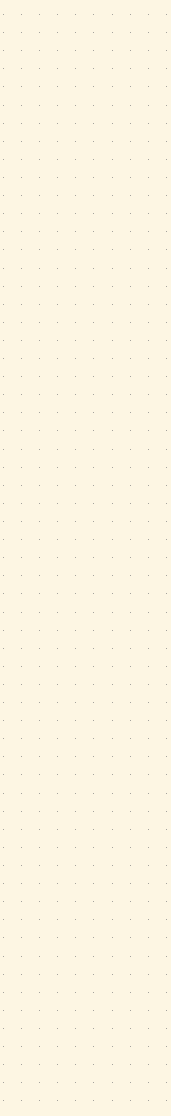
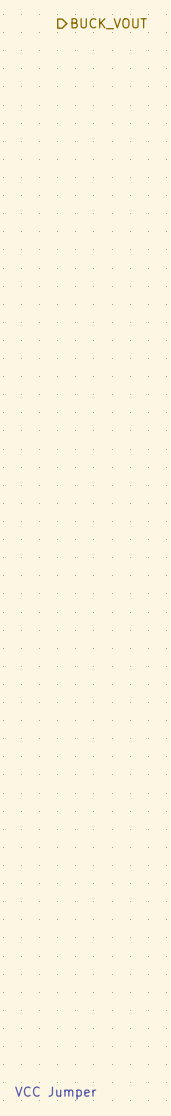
hierarchical label: none -> BUCK_VOUT (109, 23)
text: none -> VCC Jumper (55, 1093)

